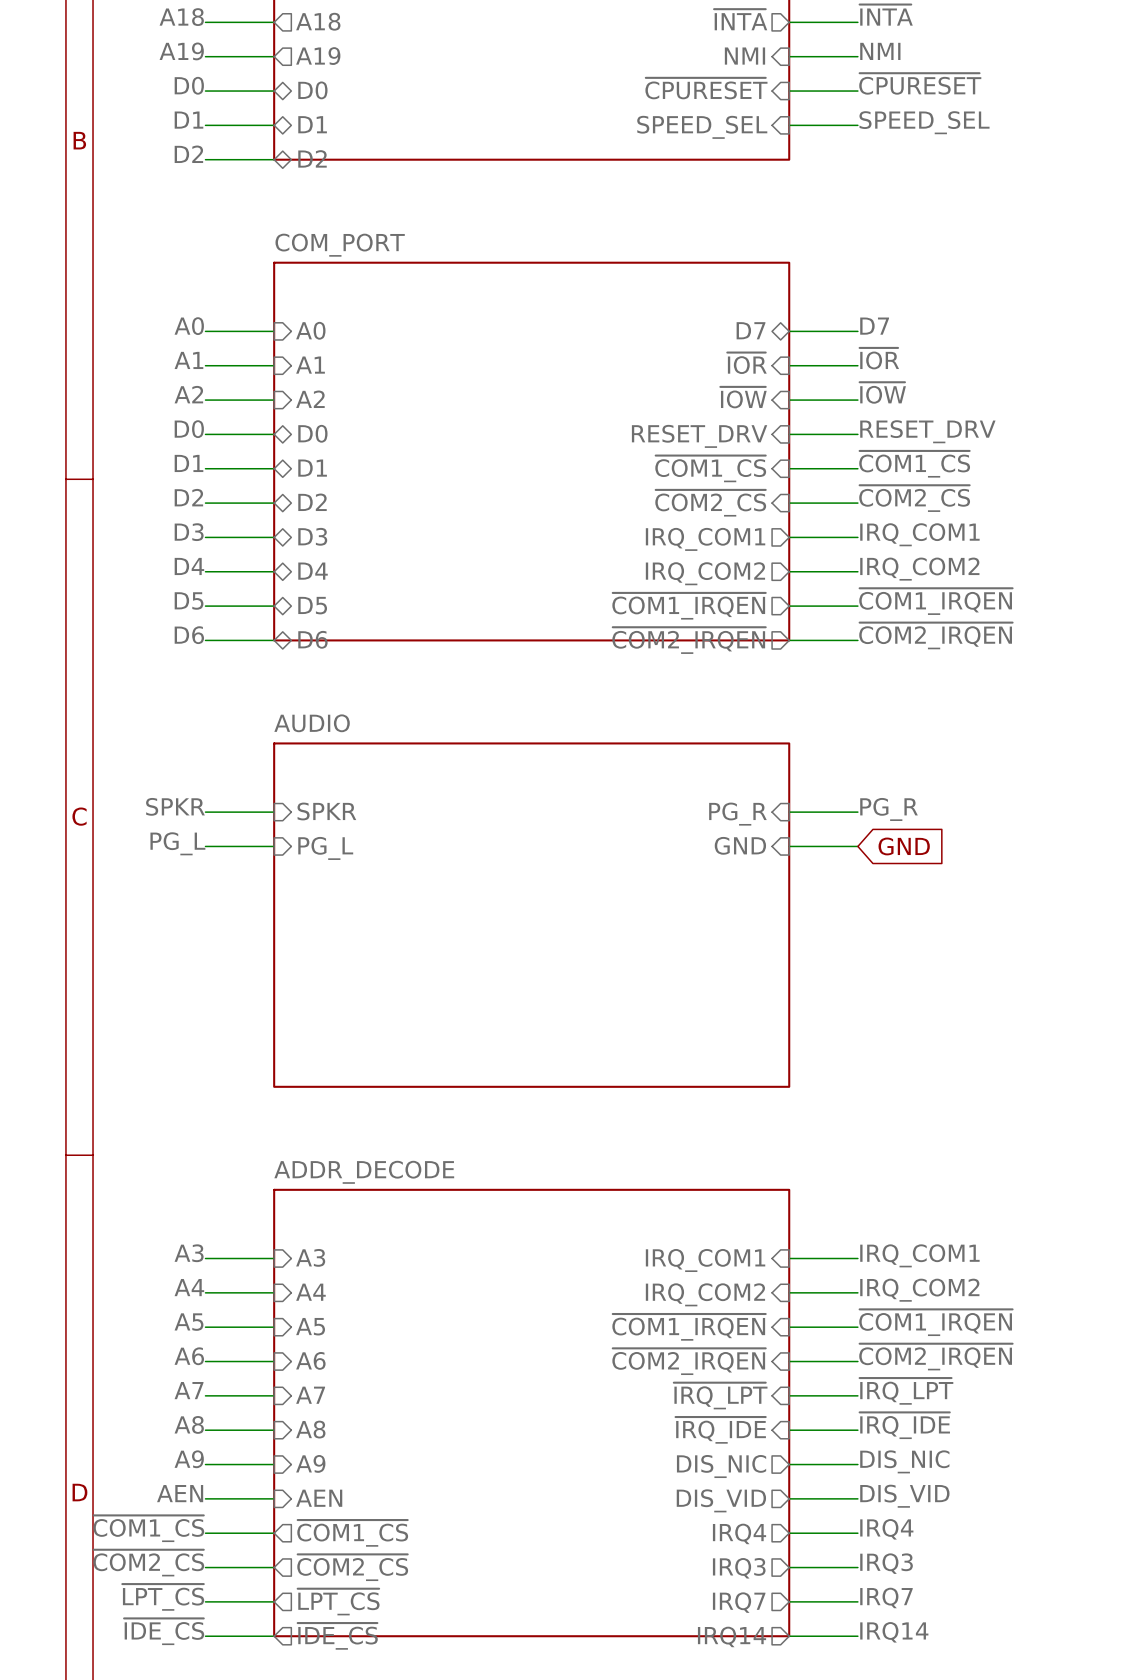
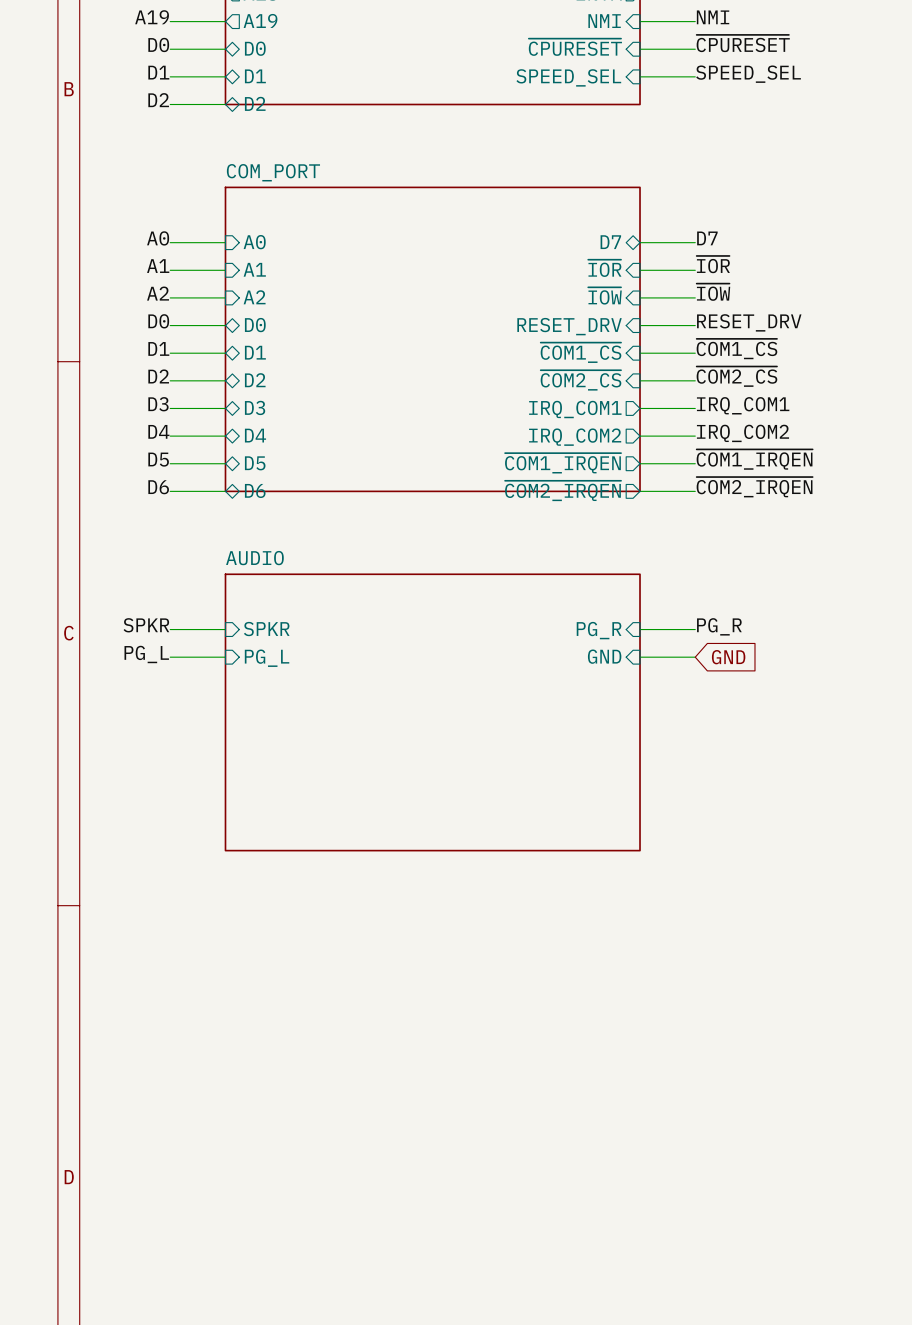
label: A3 (189, 1253) -> none
label: IRQ_COM1 (919, 1255) -> none
sheet pin: A3 (310, 1257) -> none
wire: (205, 1258) (274, 1258) -> none
wire: (789, 1258) (857, 1258) -> none
sheet pin: IRQ_COM1 (705, 1260) -> none
label: A4 (189, 1287) -> none
label: IRQ_COM2 (919, 1290) -> none
wire: (205, 1292) (274, 1292) -> none
sheet pin: A4 (310, 1292) -> none
wire: (789, 1292) (857, 1292) -> none
sheet pin: IRQ_COM2 (705, 1294) -> none
label: A5 (189, 1322) -> none
label: ~{COM1_IRQEN} (935, 1322) -> none
sheet pin: A5 (310, 1326) -> none
wire: (205, 1327) (274, 1327) -> none
sheet pin: ~{COM1_IRQEN} (689, 1327) -> none
wire: (789, 1327) (857, 1327) -> none
label: A6 (189, 1356) -> none
label: ~{COM2_IRQEN} (935, 1357) -> none
sheet pin: A6 (310, 1360) -> none
wire: (205, 1361) (274, 1361) -> none
sheet pin: ~{COM2_IRQEN} (689, 1361) -> none
wire: (789, 1361) (857, 1361) -> none
label: A7 (189, 1390) -> none
label: ~{IRQ_LPT} (906, 1391) -> none
wire: (205, 1395) (274, 1395) -> none
sheet pin: A7 (310, 1395) -> none
wire: (789, 1395) (857, 1395) -> none
sheet pin: ~{IRQ_LPT} (720, 1396) -> none
sheet ADDR_DECODE: (531, 1413) -> none
label: A8 (189, 1424) -> none
label: ~{IRQ_IDE} (904, 1425) -> none
sheet pin: A8 (310, 1429) -> none
wire: (205, 1430) (274, 1430) -> none
sheet pin: ~{IRQ_IDE} (720, 1430) -> none
wire: (789, 1430) (857, 1430) -> none
label: A9 (189, 1459) -> none
label: DIS_NIC (904, 1461) -> none
sheet pin: A9 (310, 1463) -> none
wire: (205, 1464) (274, 1464) -> none
wire: (789, 1464) (857, 1464) -> none
sheet pin: DIS_NIC (721, 1466) -> none
label: AEN (180, 1493) -> none
label: DIS_VID (904, 1496) -> none
wire: (205, 1498) (274, 1498) -> none
sheet pin: AEN (319, 1498) -> none
wire: (789, 1498) (857, 1498) -> none
sheet pin: DIS_VID (721, 1500) -> none
label: ~{COM1_CS} (148, 1528) -> none
label: IRQ4 (886, 1529) -> none
wire: (205, 1533) (274, 1533) -> none
sheet pin: ~{COM1_CS} (352, 1533) -> none
sheet pin: IRQ4 (739, 1533) -> none
wire: (789, 1533) (857, 1533) -> none
label: ~{COM2_CS} (148, 1563) -> none
label: IRQ3 (886, 1563) -> none
wire: (205, 1567) (274, 1567) -> none
sheet pin: ~{COM2_CS} (352, 1567) -> none
wire: (789, 1567) (857, 1567) -> none
sheet pin: IRQ3 (739, 1568) -> none
label: ~{LPT_CS} (163, 1597) -> none
label: IRQ7 (886, 1597) -> none
wire: (205, 1601) (274, 1601) -> none
wire: (789, 1601) (857, 1601) -> none
sheet pin: ~{LPT_CS} (338, 1602) -> none
sheet pin: IRQ7 (739, 1602) -> none
label: ~{IDE_CS} (164, 1631) -> none
label: IRQ14 (894, 1632) -> none
wire: (205, 1636) (274, 1636) -> none
sheet pin: ~{IDE_CS} (337, 1636) -> none
sheet pin: IRQ14 (732, 1636) -> none
wire: (789, 1636) (857, 1636) -> none

